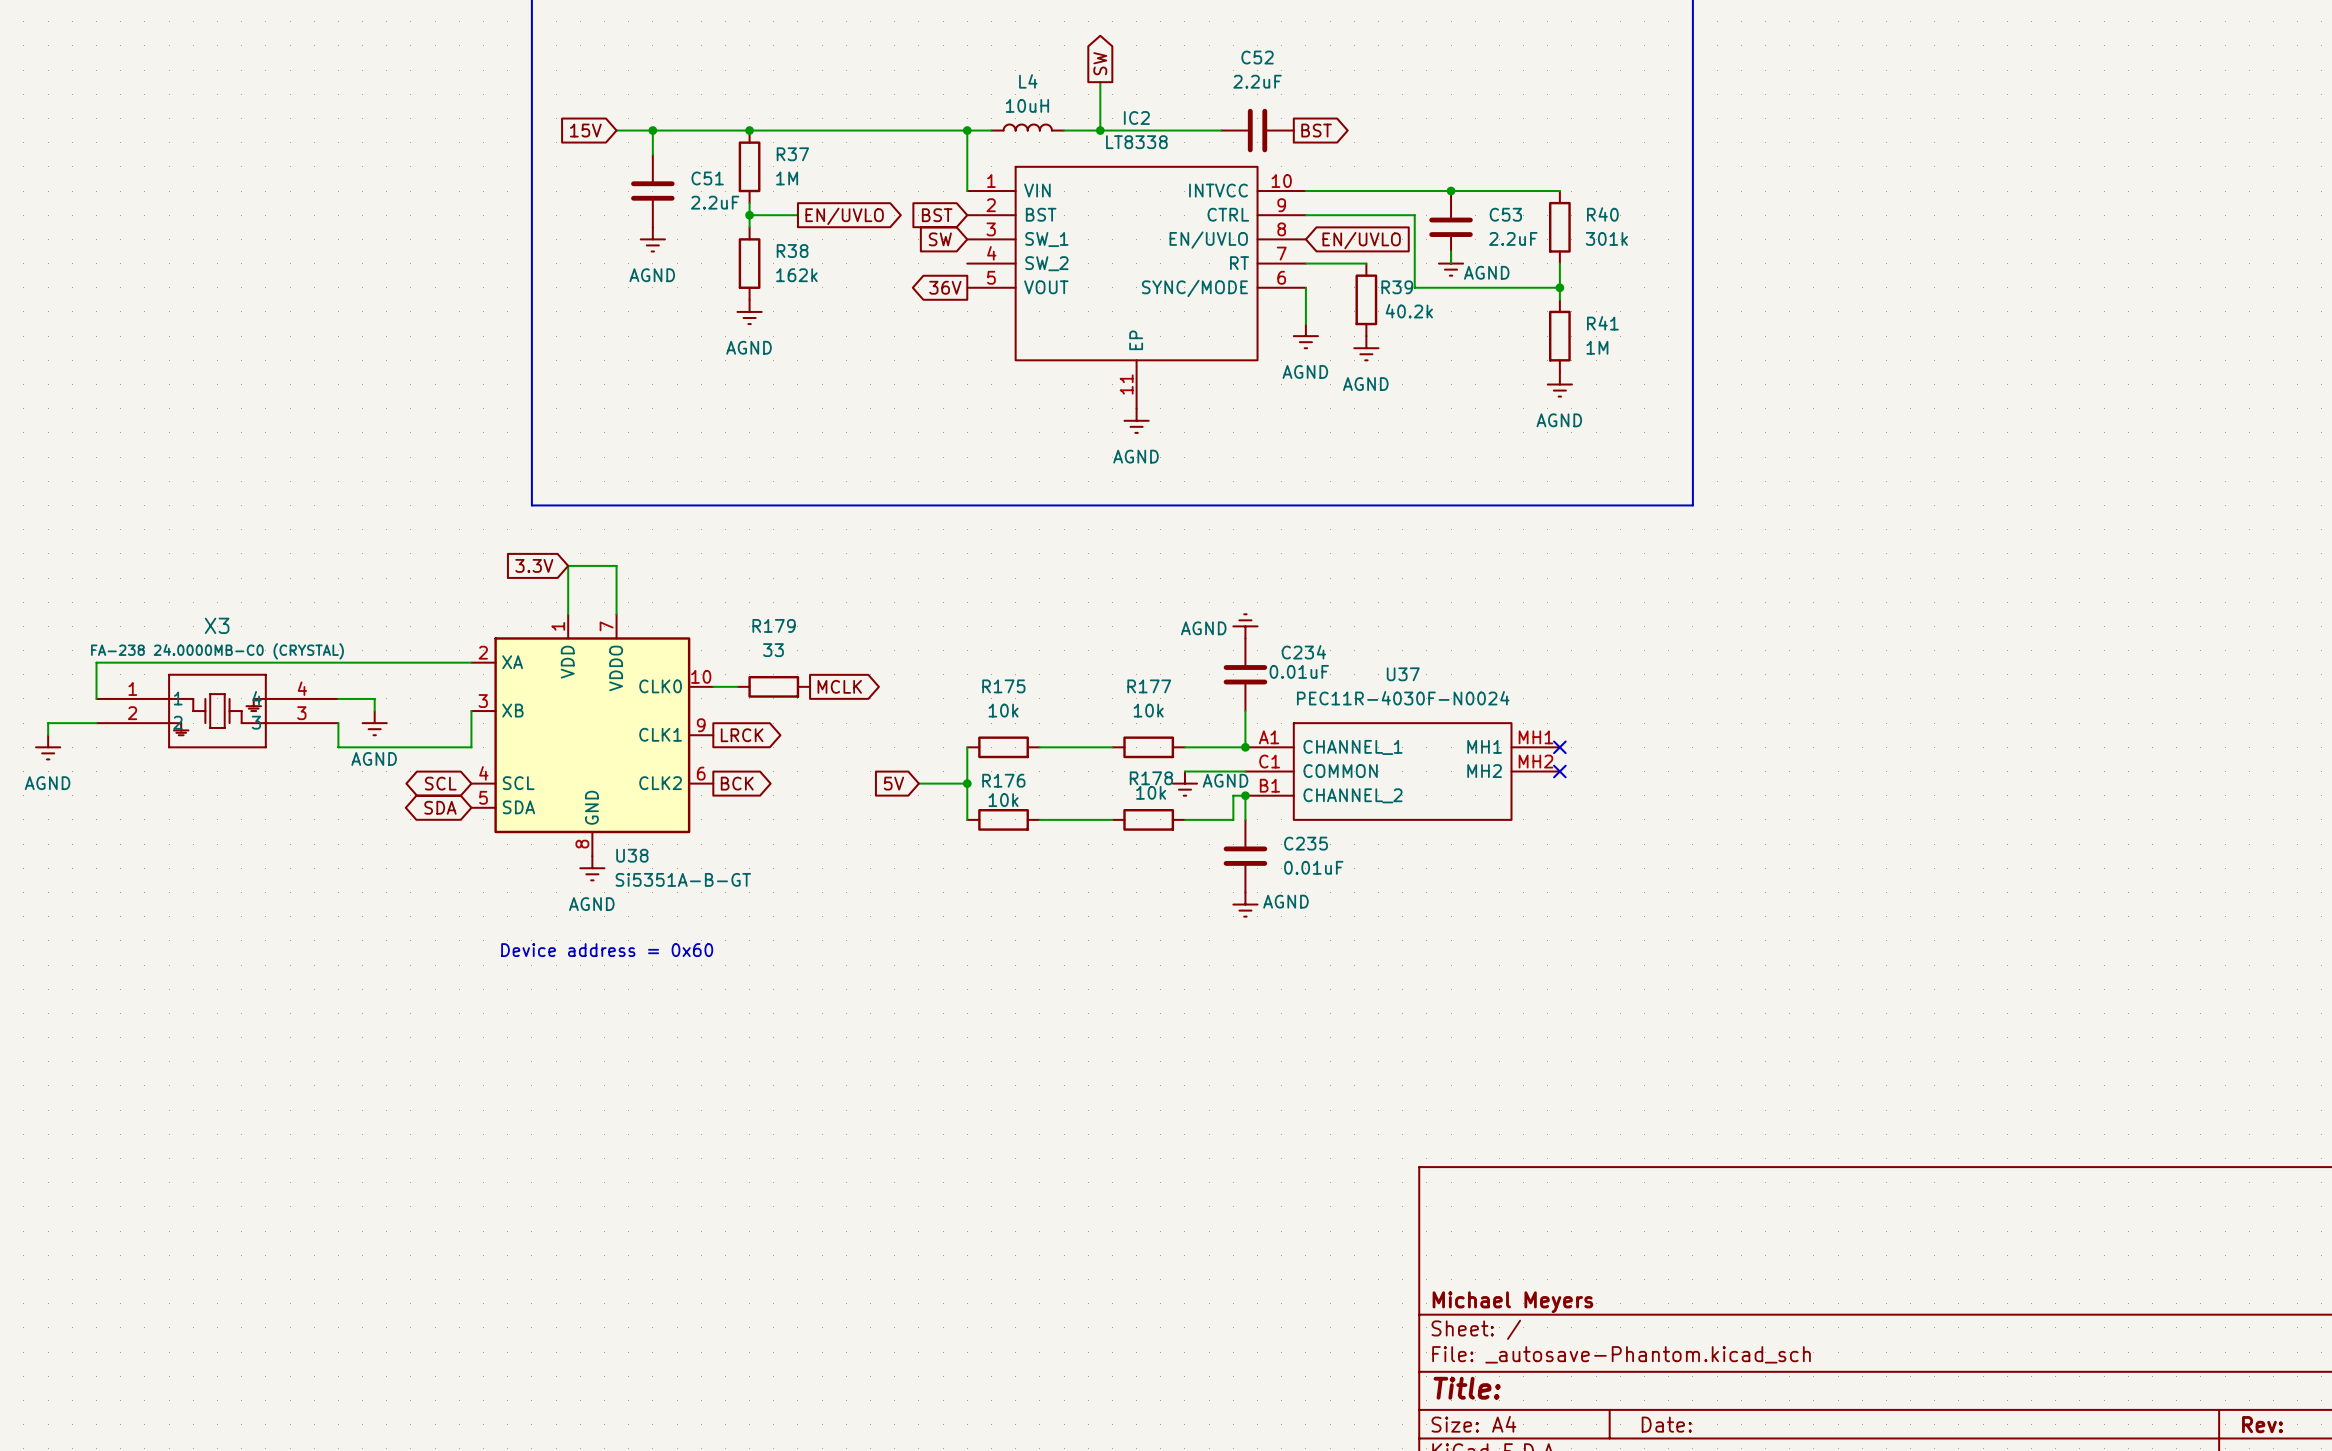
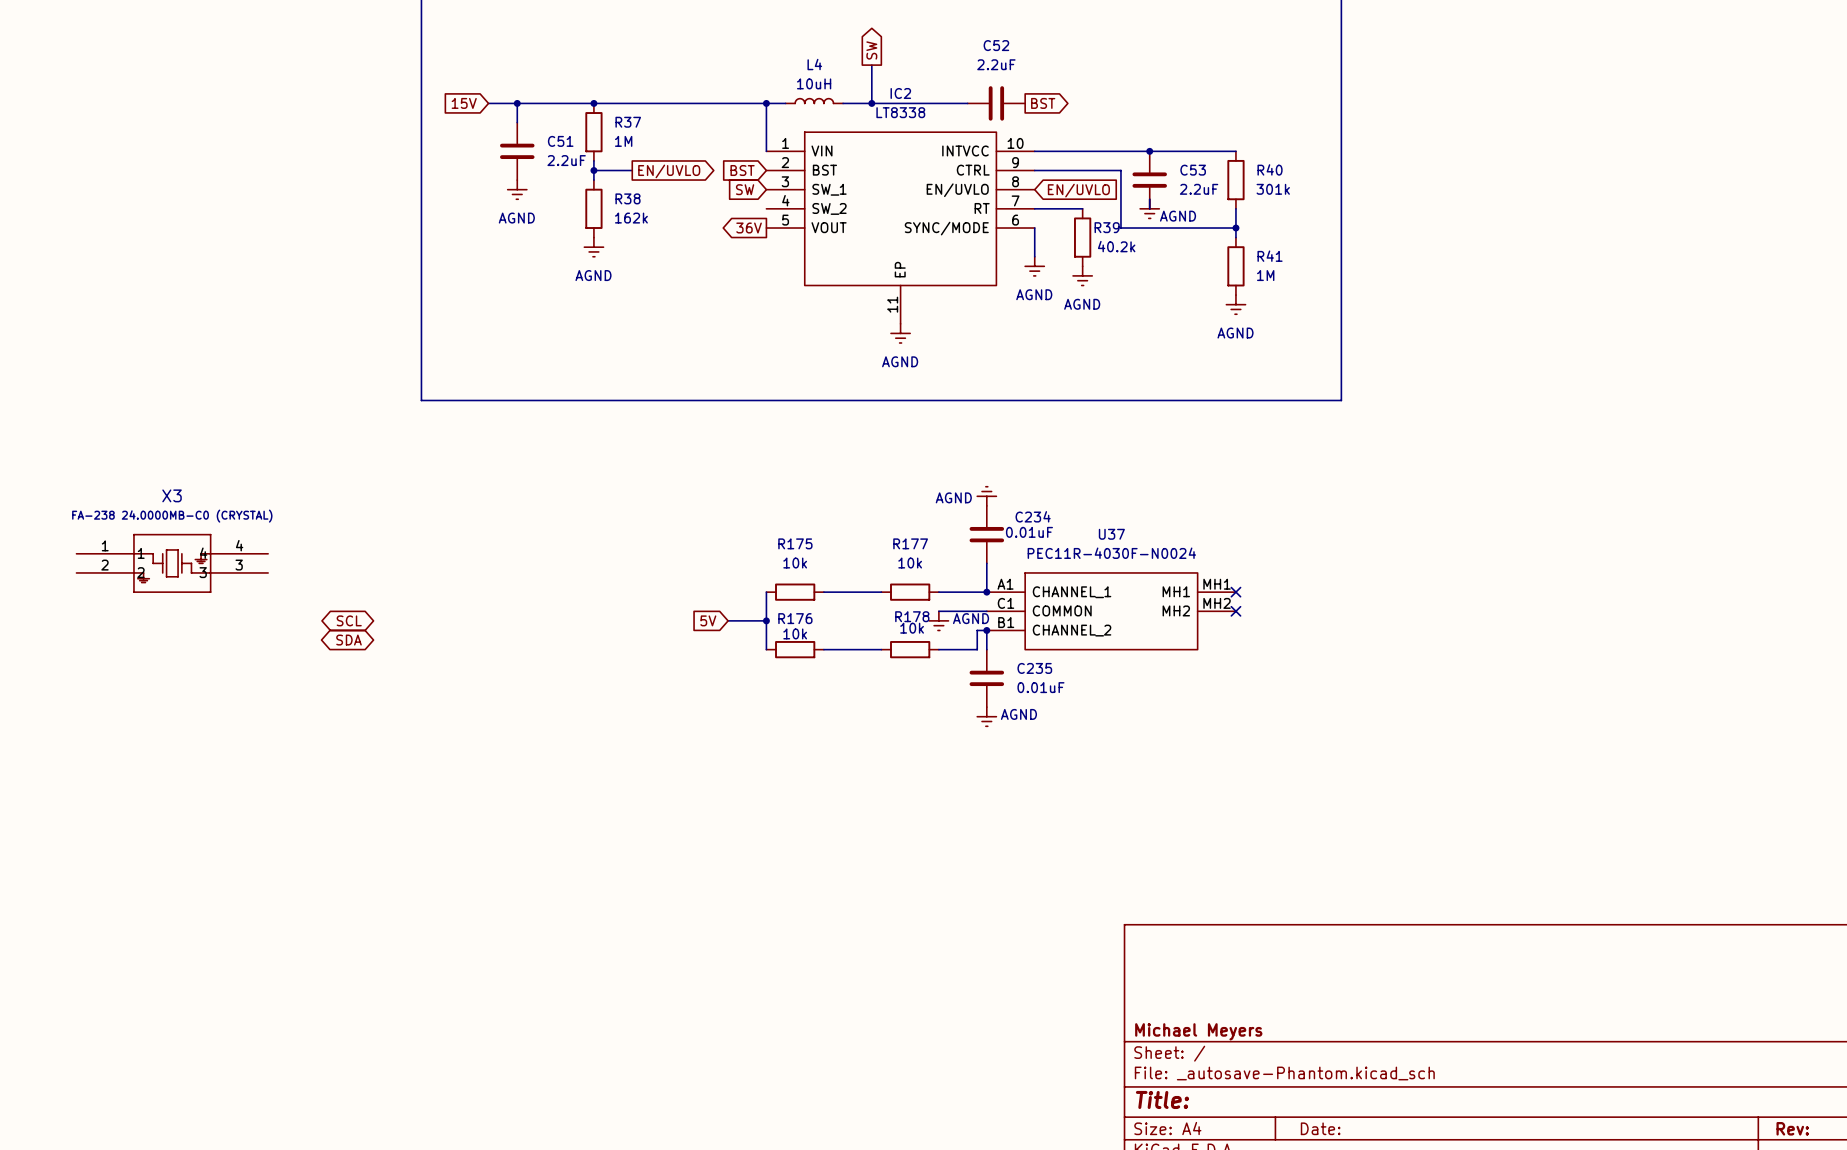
global label: 3.3V (534, 565) -> none
wire: (568, 614) (568, 565) (616, 565) (616, 614) -> none
wire: (471, 662) (96, 662) (96, 698) -> none
wire: (713, 686) (737, 686) -> none
R179: 33 (773, 686) -> none
global label: MCLK (839, 686) -> none
wire: (338, 698) (374, 698) (374, 711) -> none
wire: (471, 711) (471, 747) (338, 747) (338, 723) -> none
wire: (96, 723) (48, 723) (48, 735) -> none
power symbol: AGND (374, 723) -> none
U38: Si5351A-B-GT (592, 735) -> none
global label: LRCK (742, 735) -> none
power symbol: AGND (48, 747) -> none
global label: BCK (737, 783) -> none
power symbol: AGND (592, 868) -> none
text: Device address = 0x60 (607, 950) -> none

